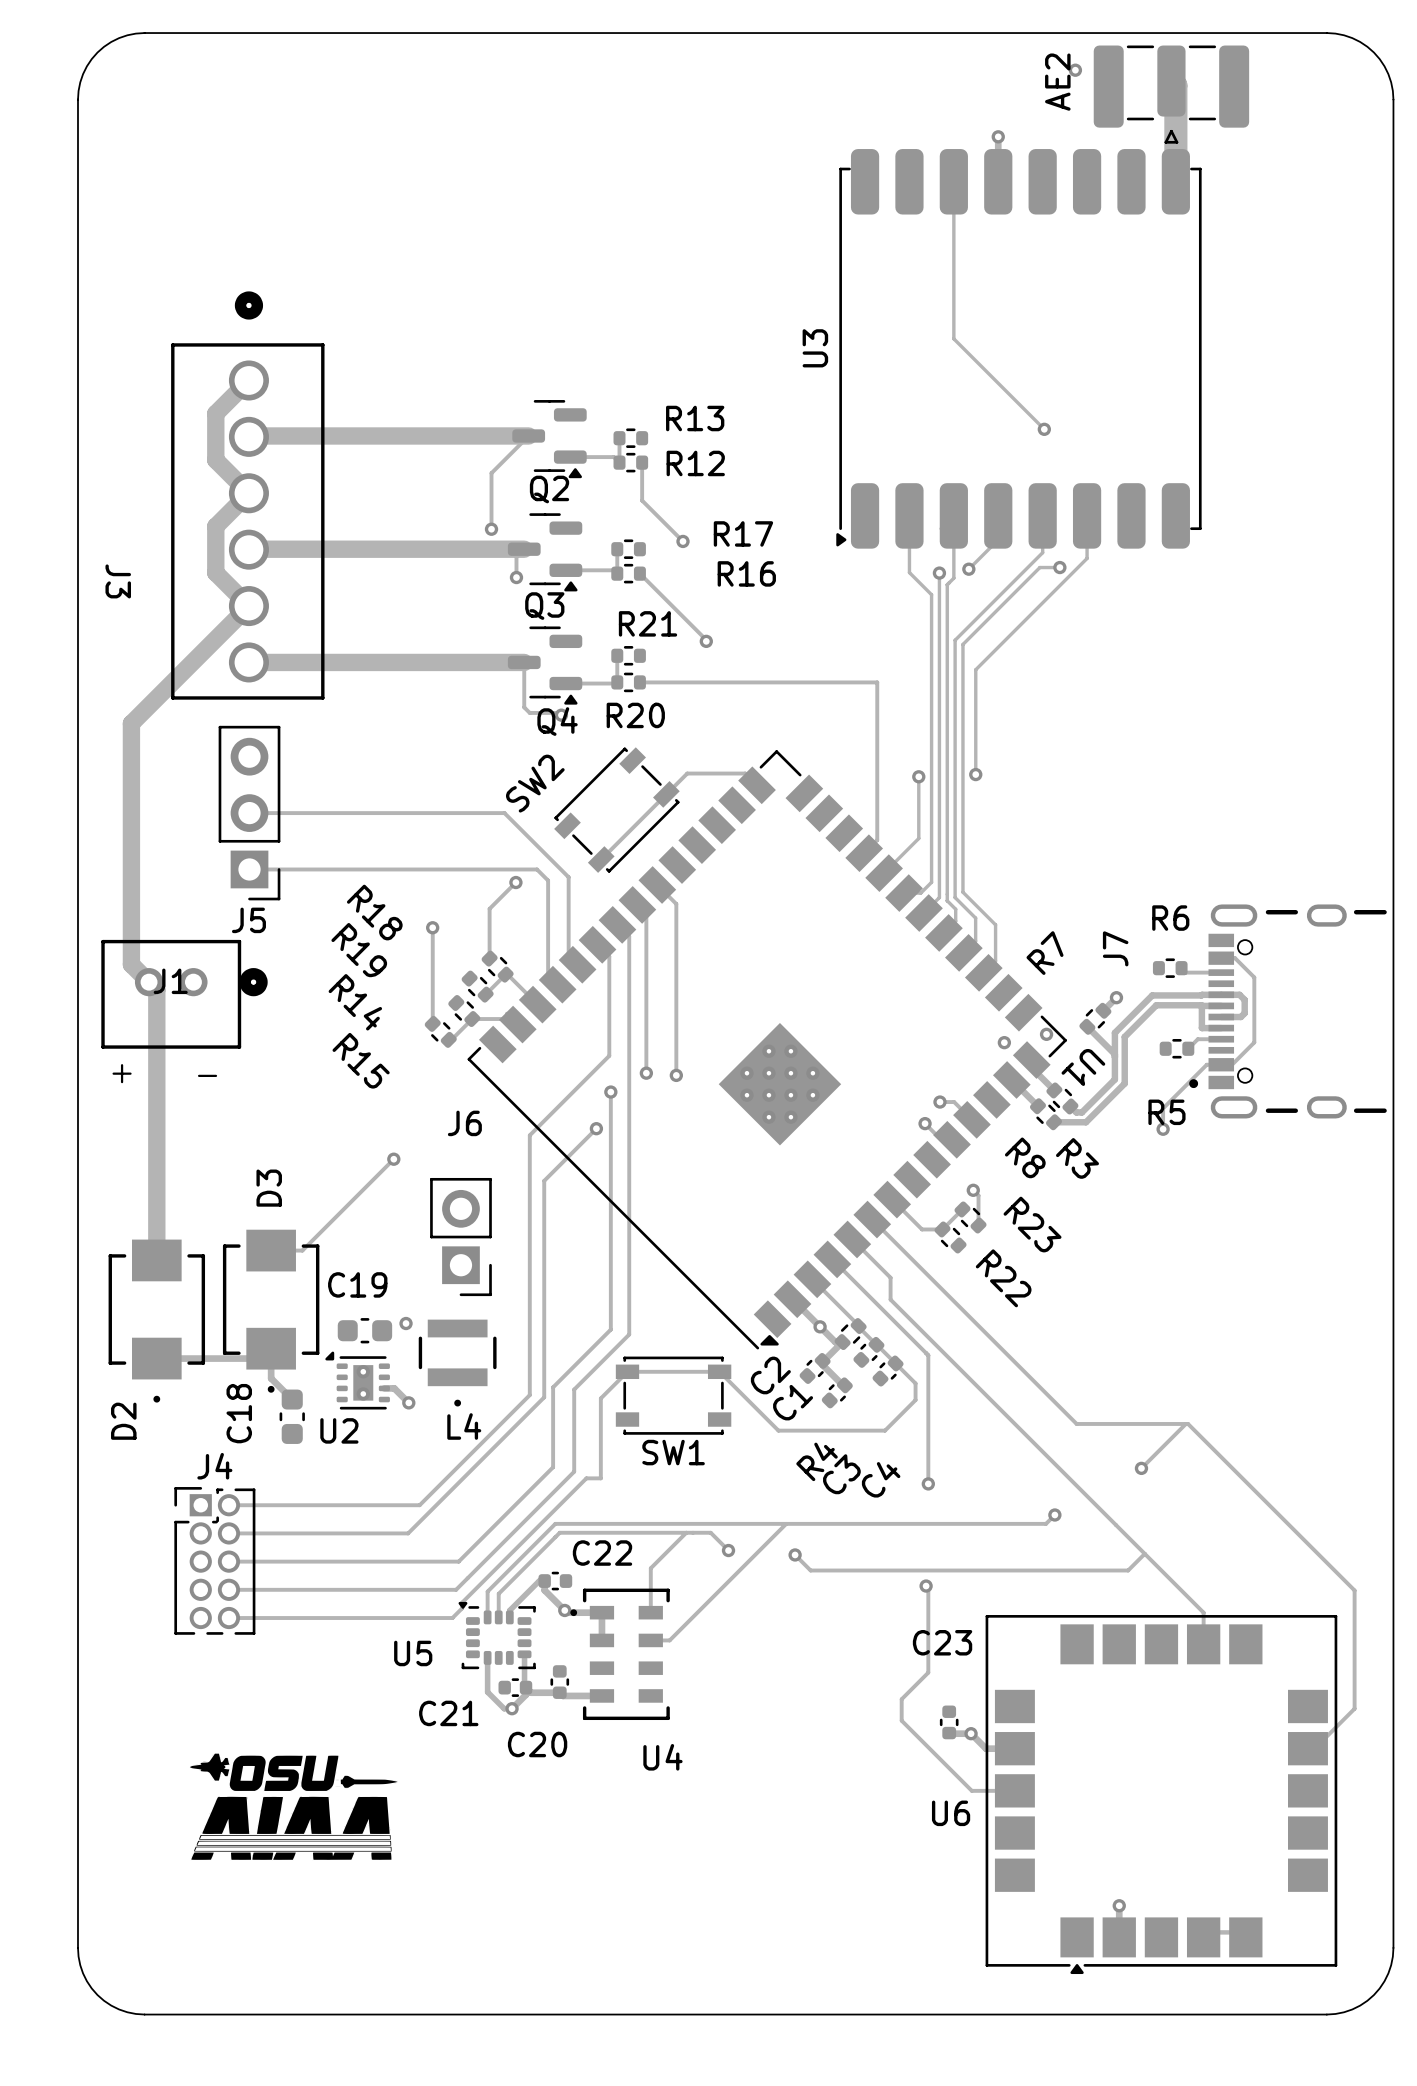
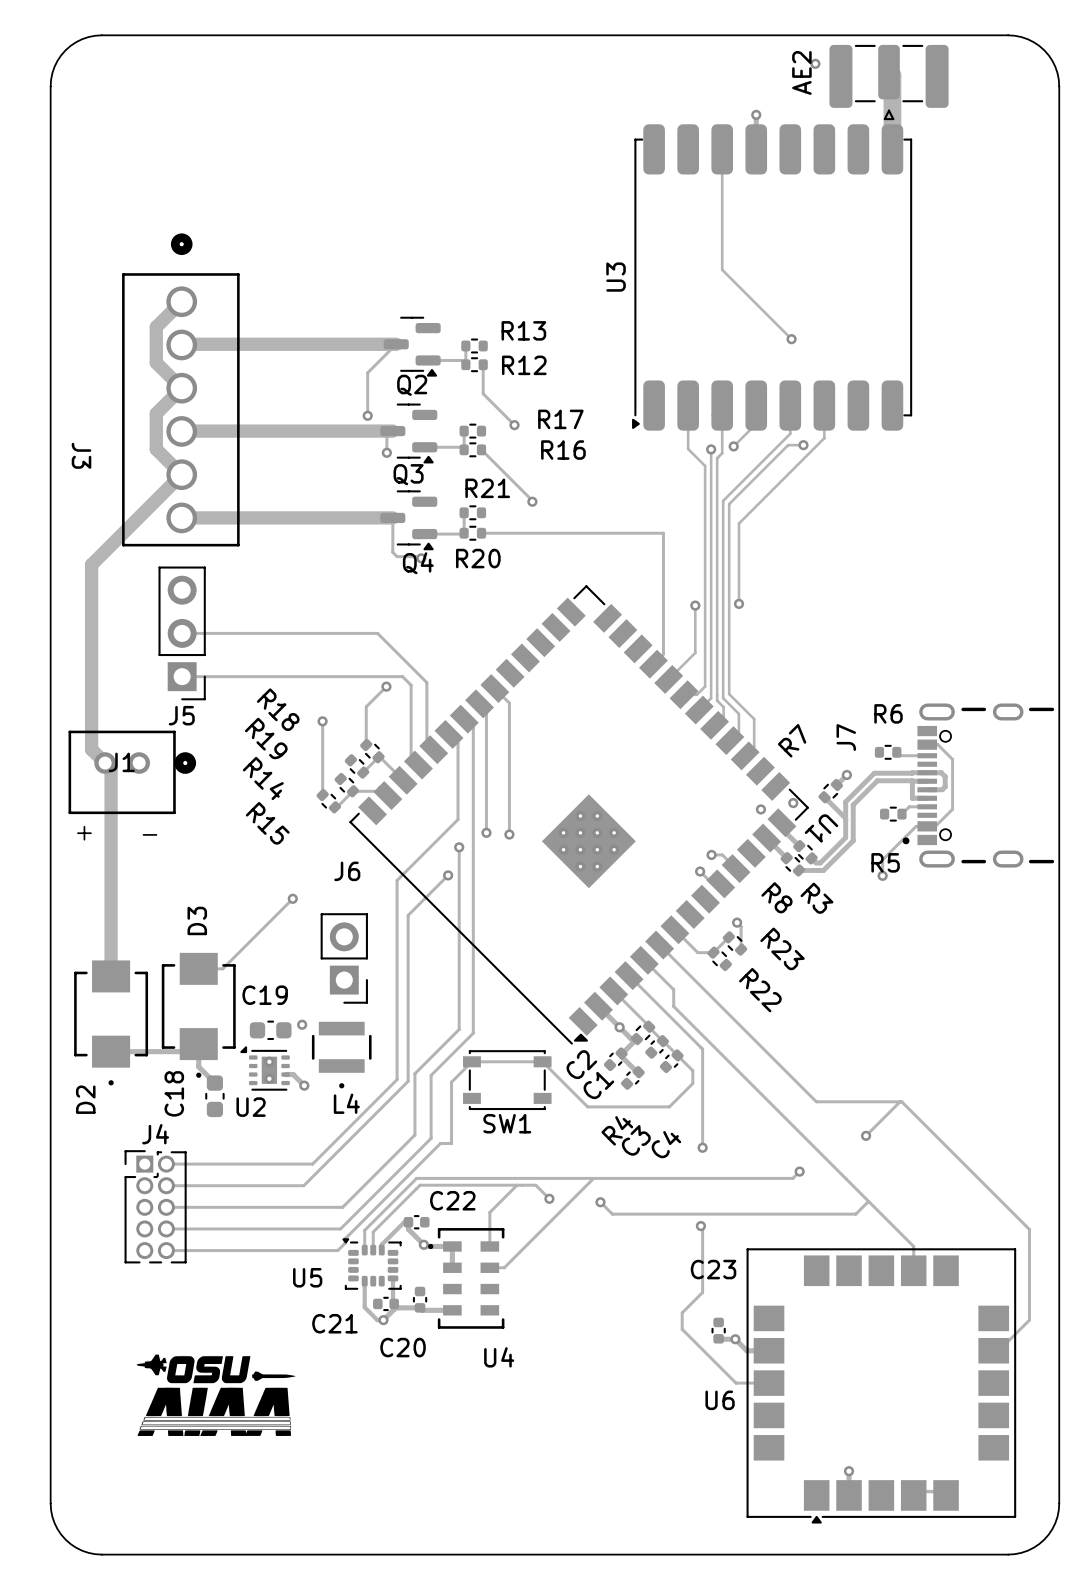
track: (757, 785) (745, 773) (687, 773) (601, 859) -> none
SW2: (616, 810) -> none

